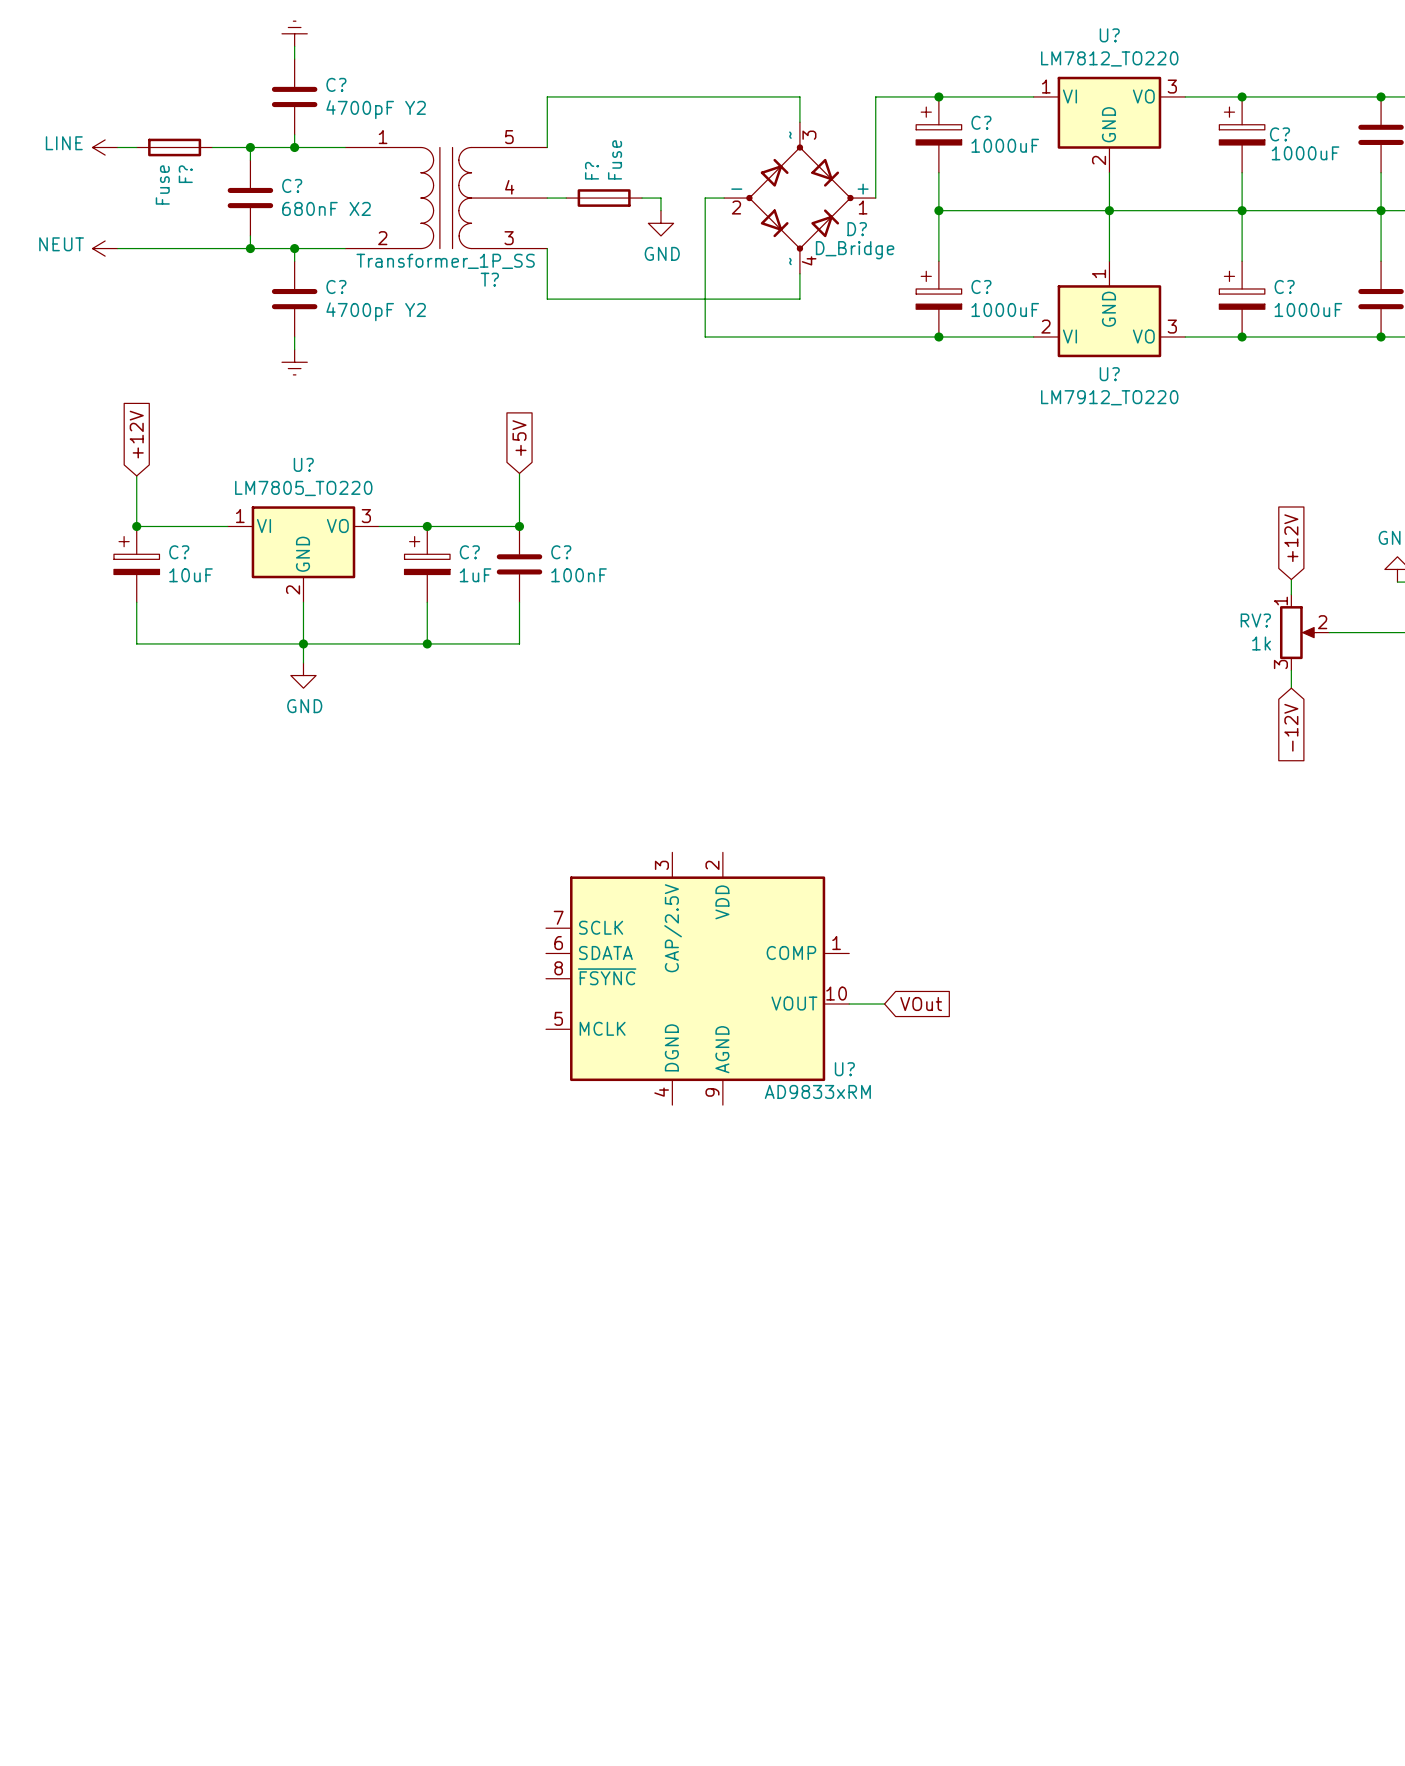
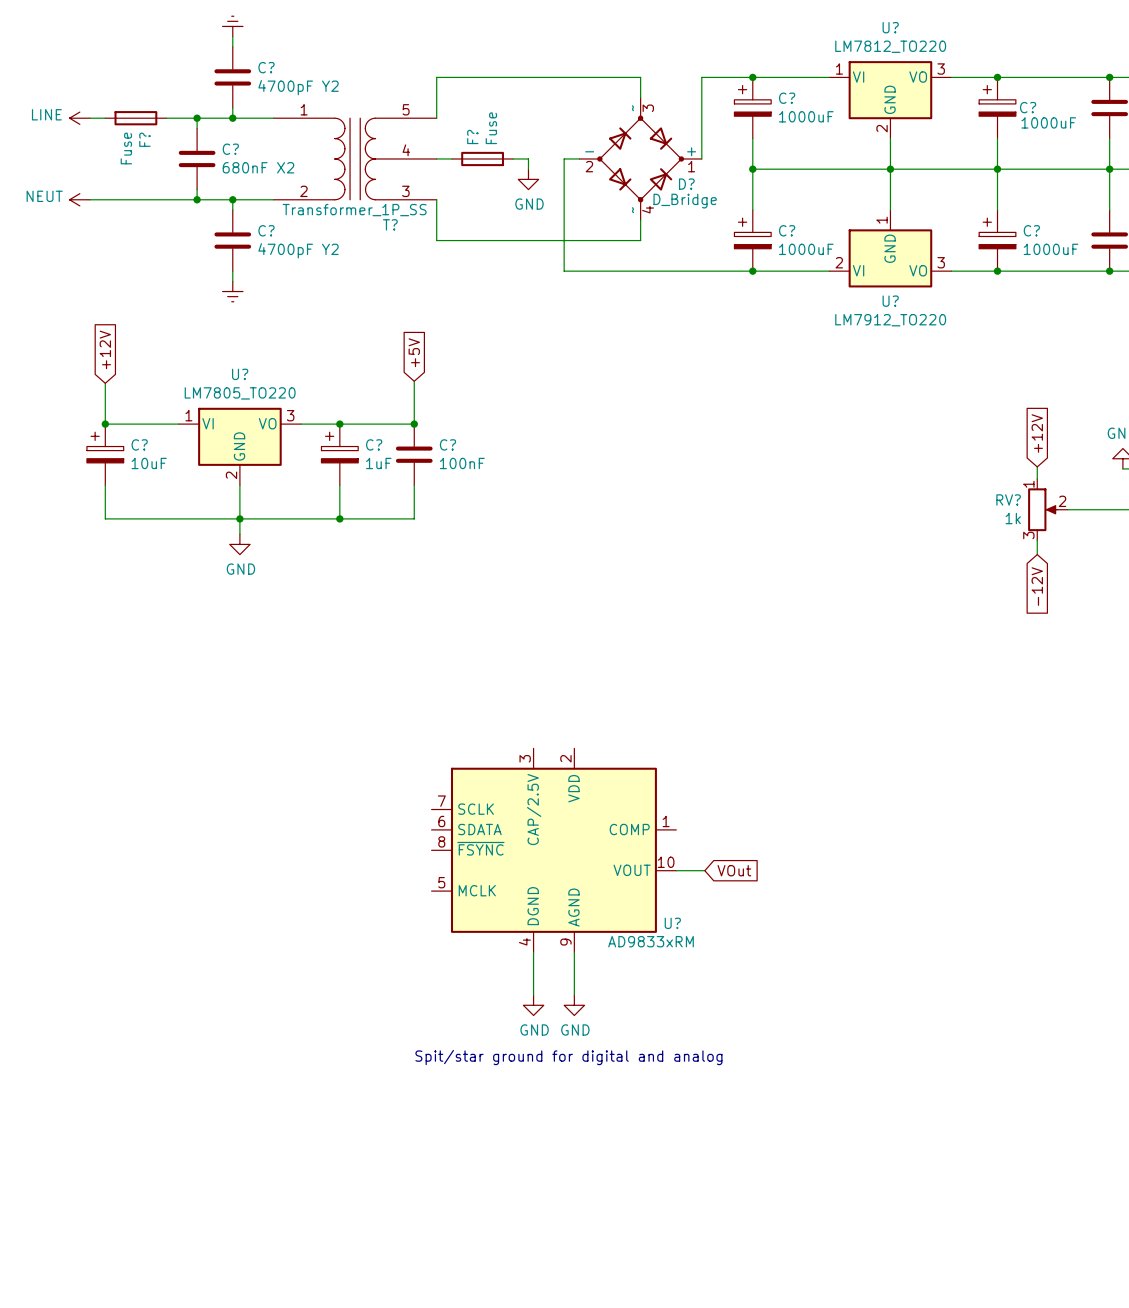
U? position: (697, 978) -> (553, 850)
wire: (849, 1004) (884, 1004) -> (676, 870) (704, 870)
global label position: VOut (921, 1004) -> VOut (734, 870)
wire: none -> (533, 952) (533, 995)
wire: none -> (574, 952) (574, 995)
power symbol: none -> GND (533, 1005)
power symbol: none -> GND (574, 1005)
text: none -> Spit/star ground for digital and analog (568, 1057)

